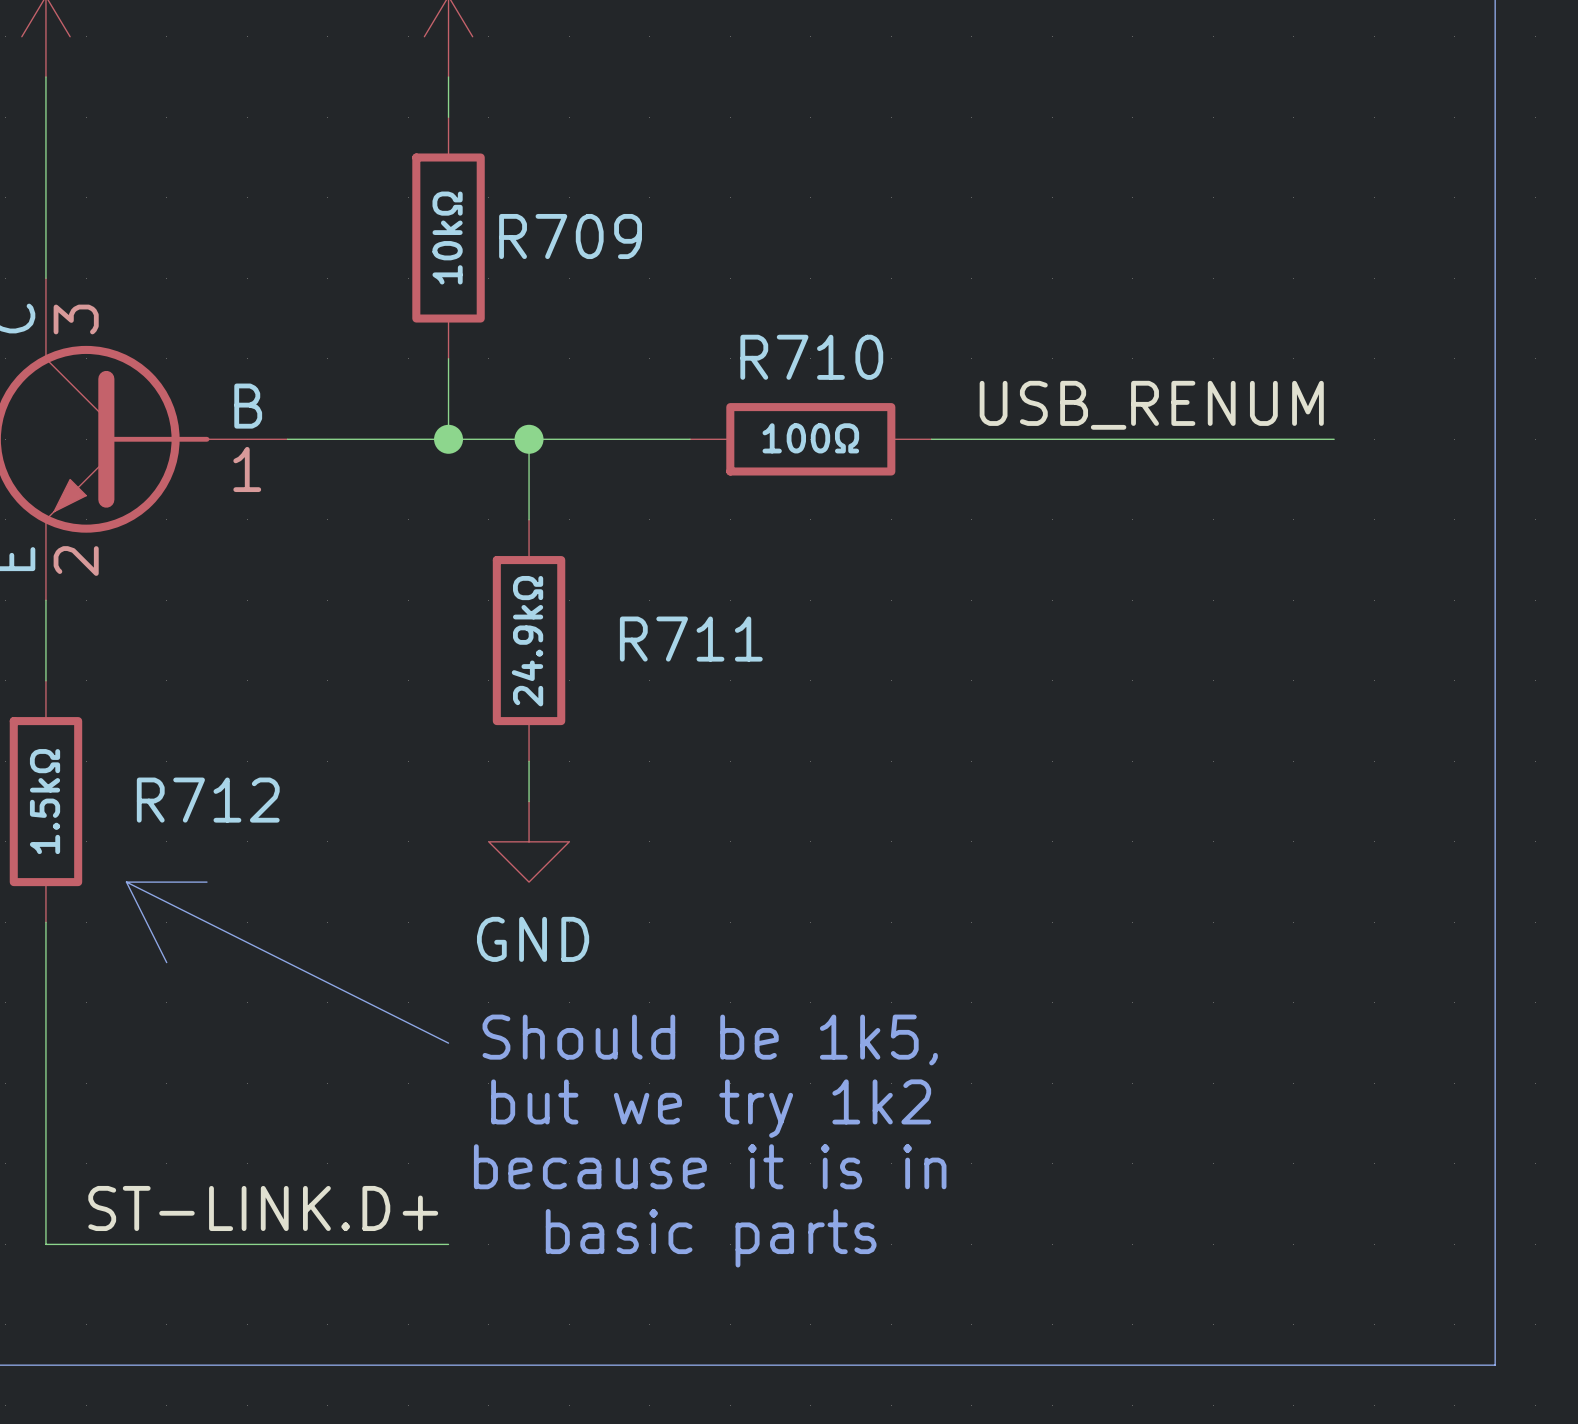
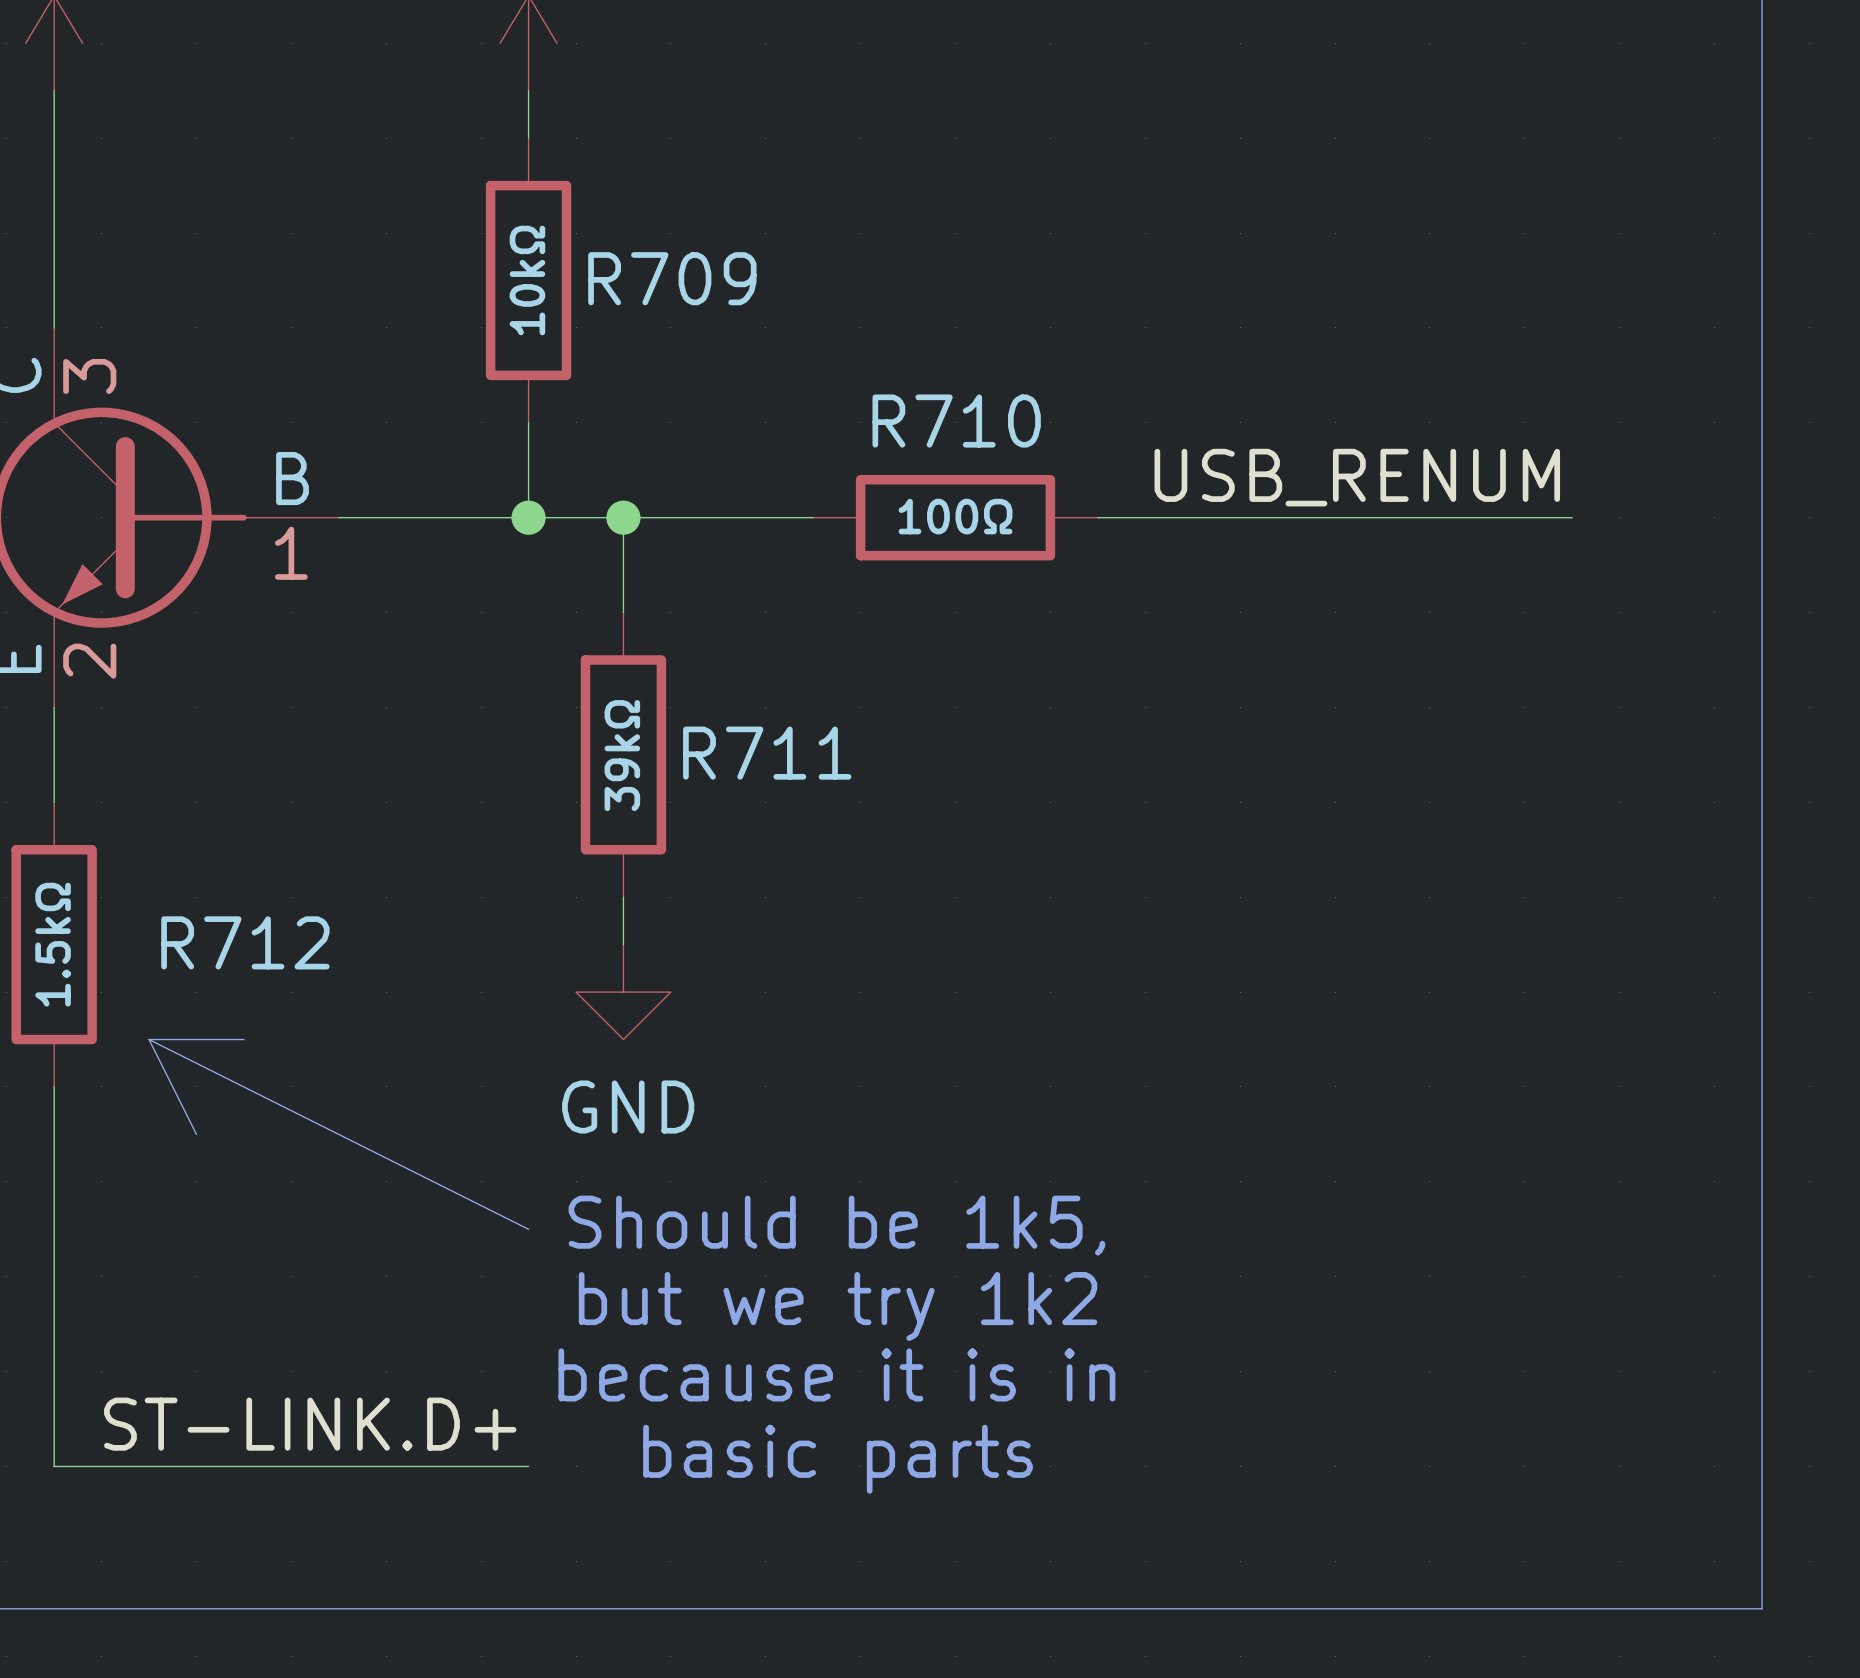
R711 name position: R711 (691, 639) -> R711 (767, 753)
R711 value: 24.9kΩ (527, 641) -> 39kΩ (622, 755)

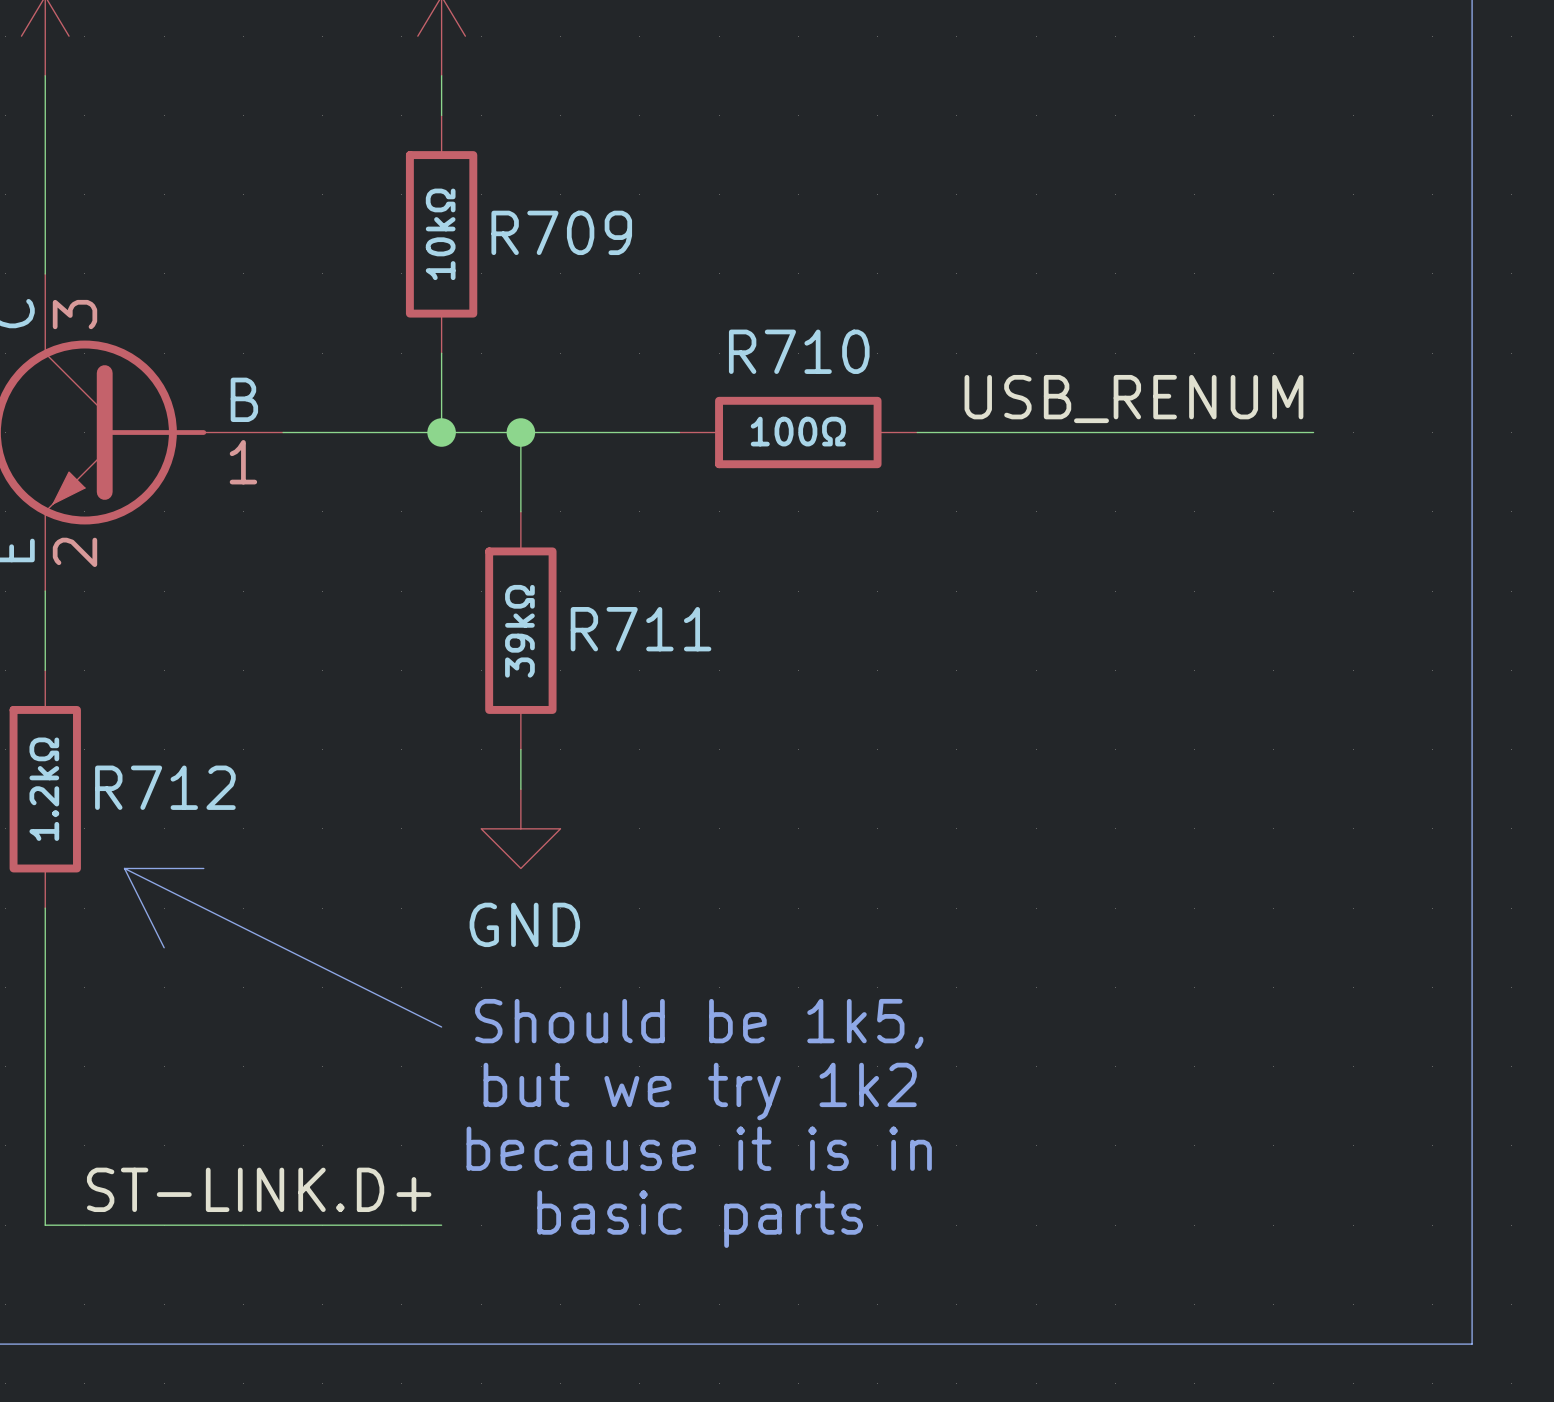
R712 name position: R712 (245, 942) -> R712 (165, 787)
R712 value: 1.5kΩ (53, 944) -> 1.2kΩ (44, 789)

